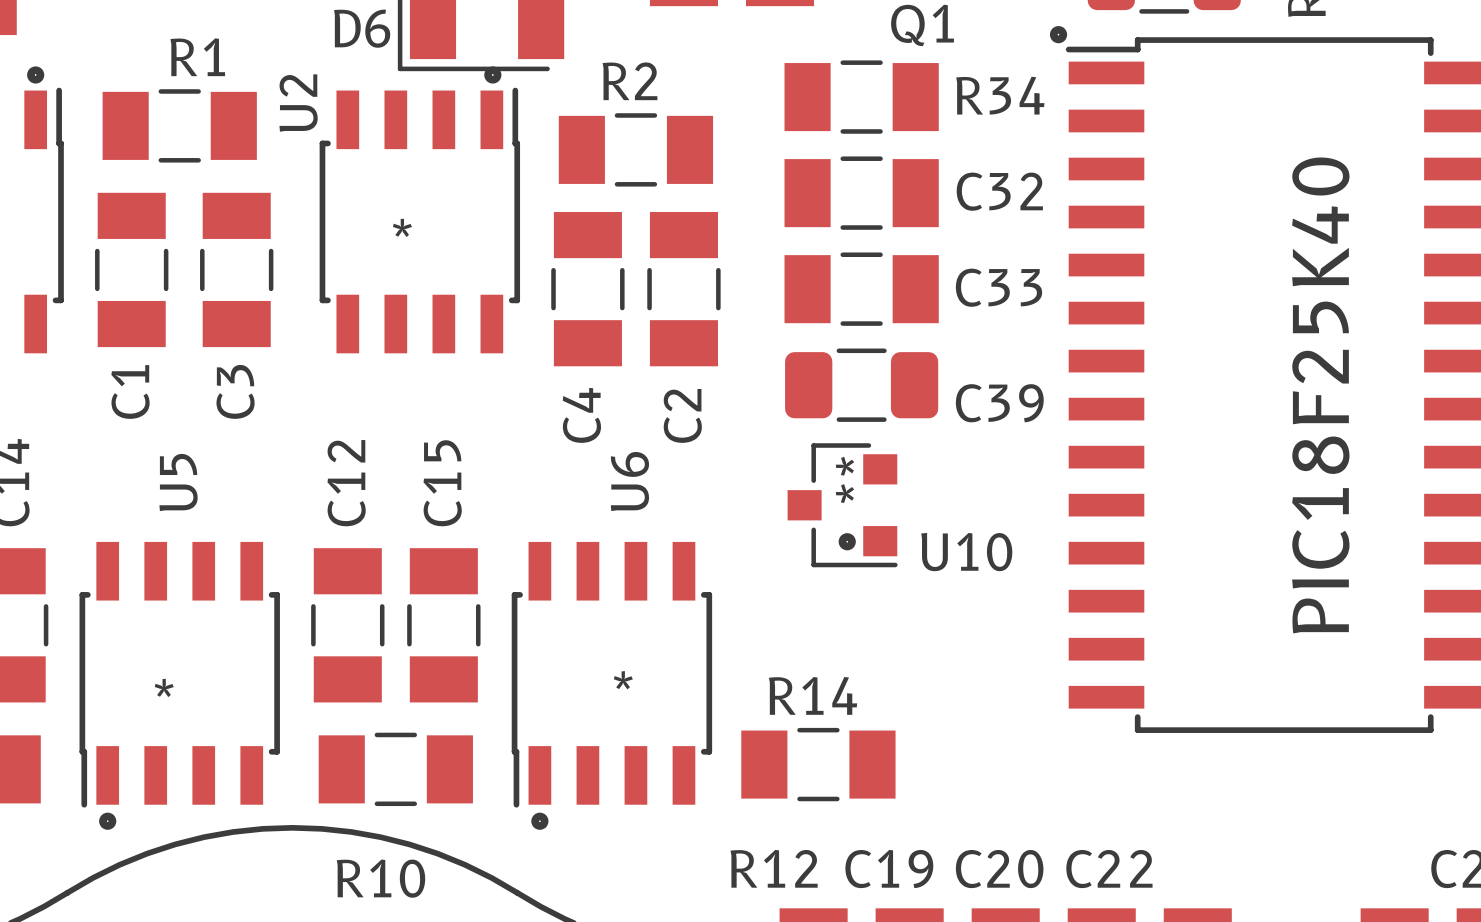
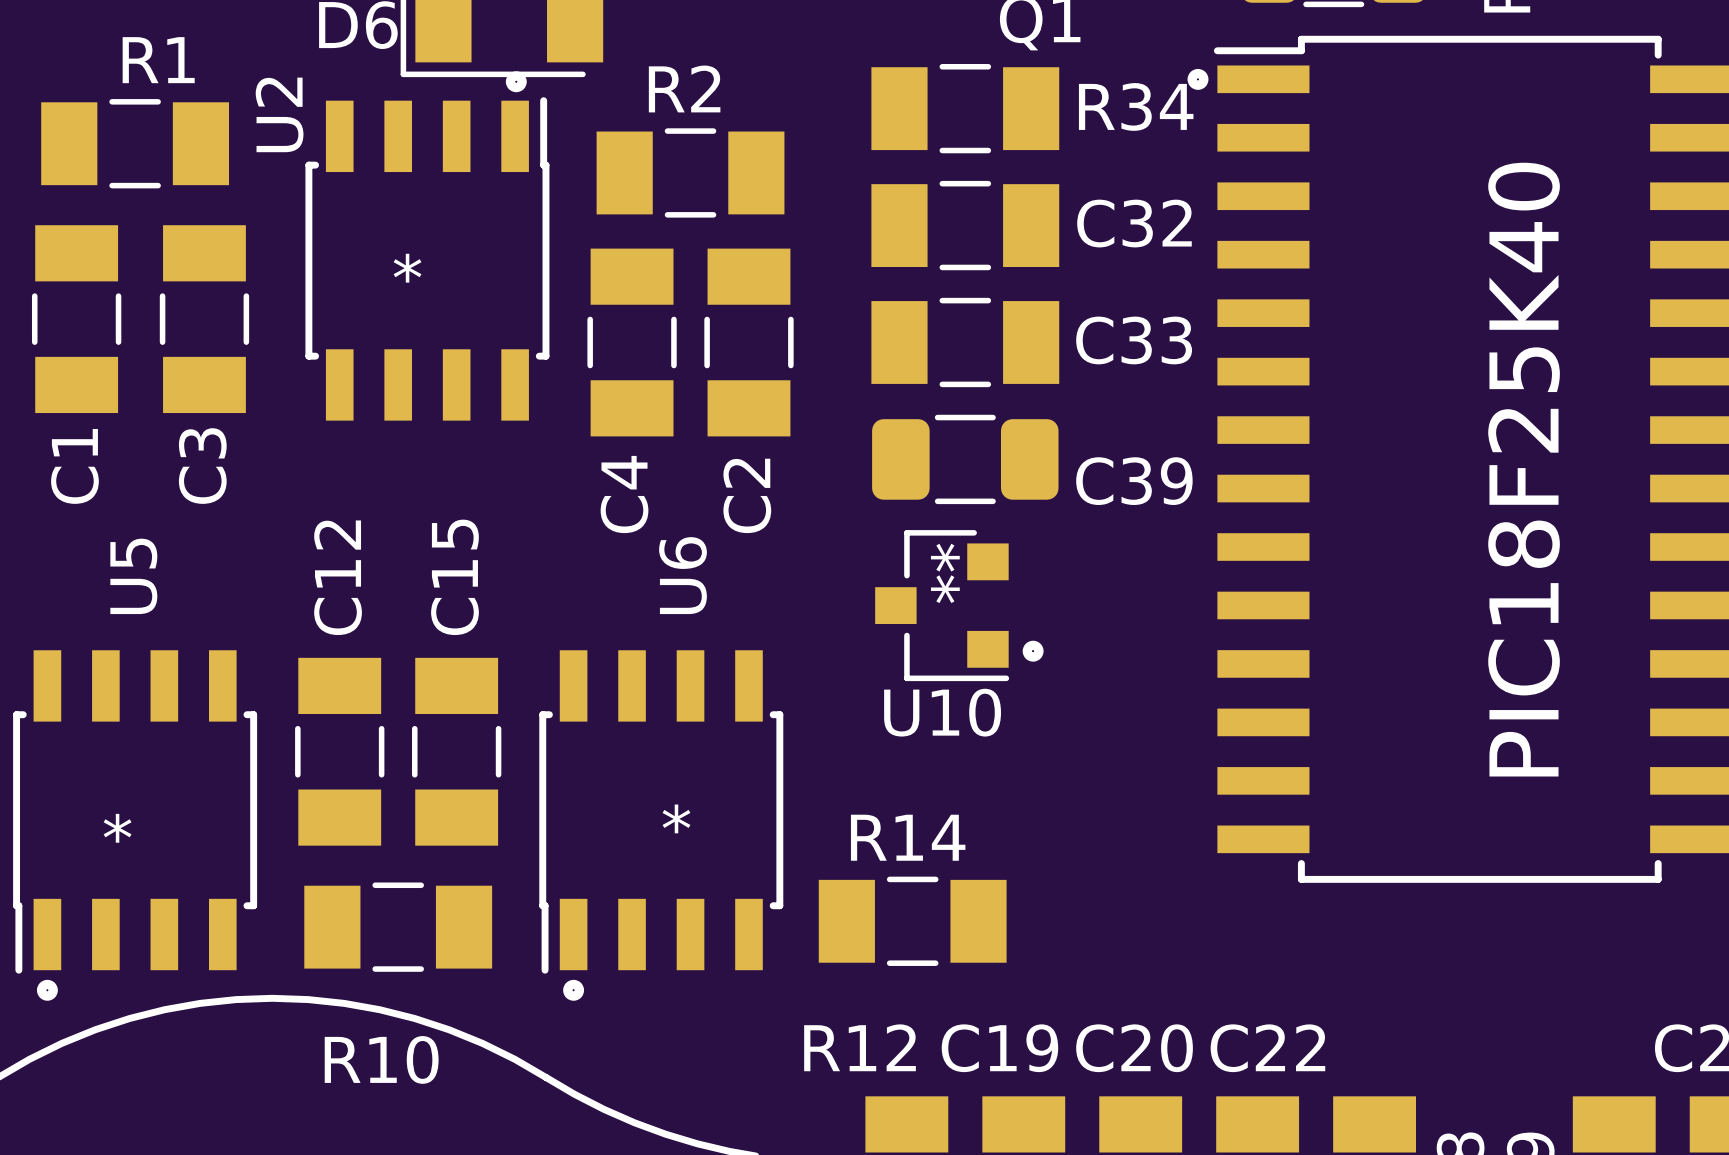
drawing position: (1058, 34) -> (1198, 79)
drawing position: (847, 541) -> (1033, 651)
U10 name position: U10 (966, 552) -> U10 (942, 712)

